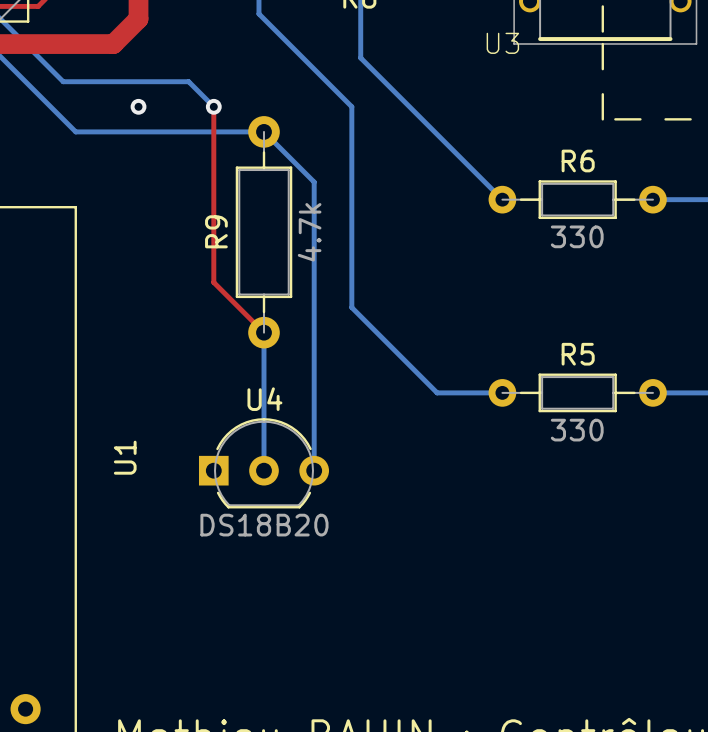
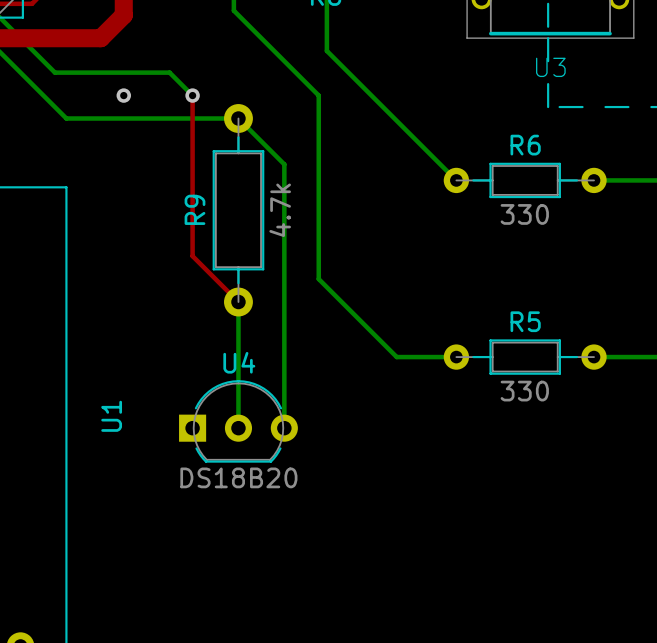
U3 name position: U3 (502, 43) -> U3 (550, 67)

